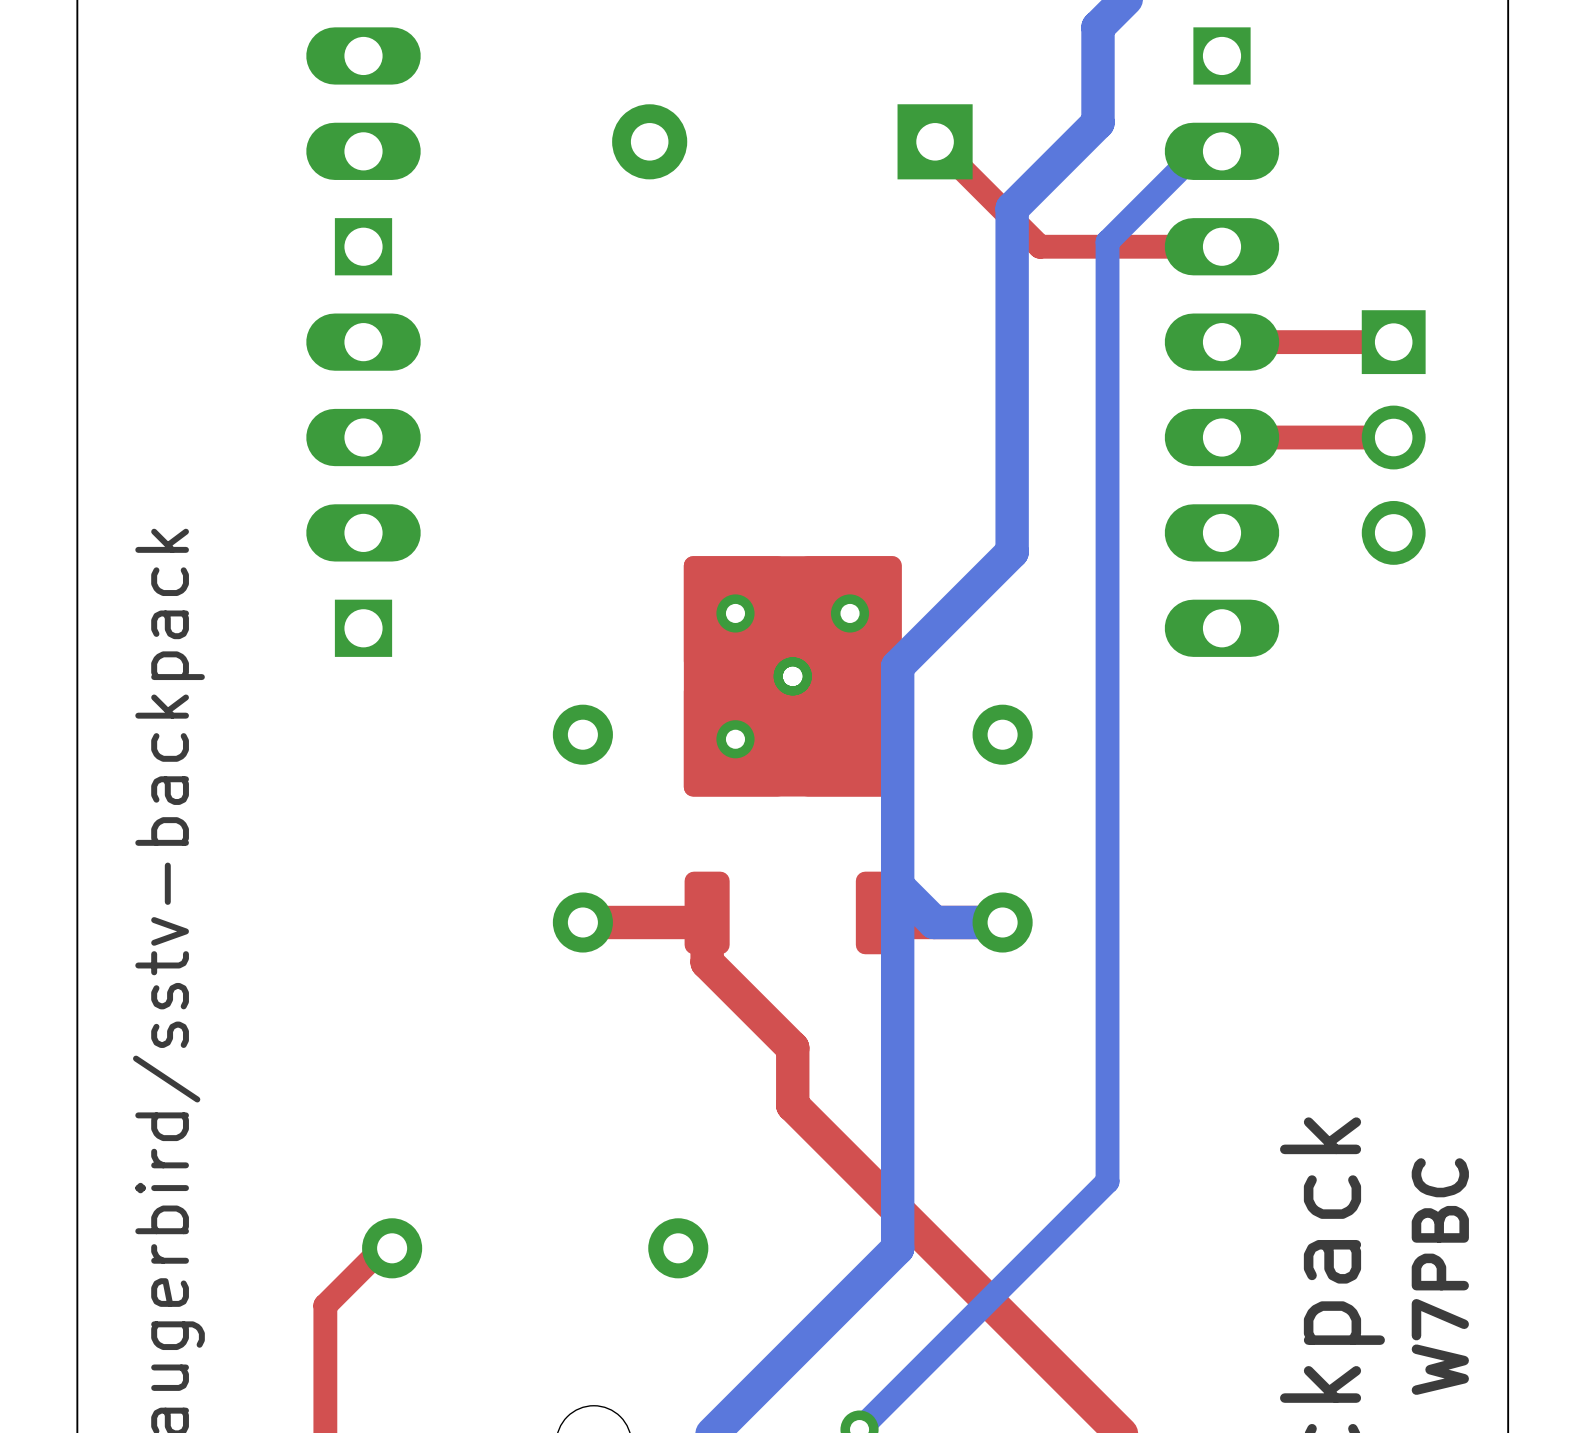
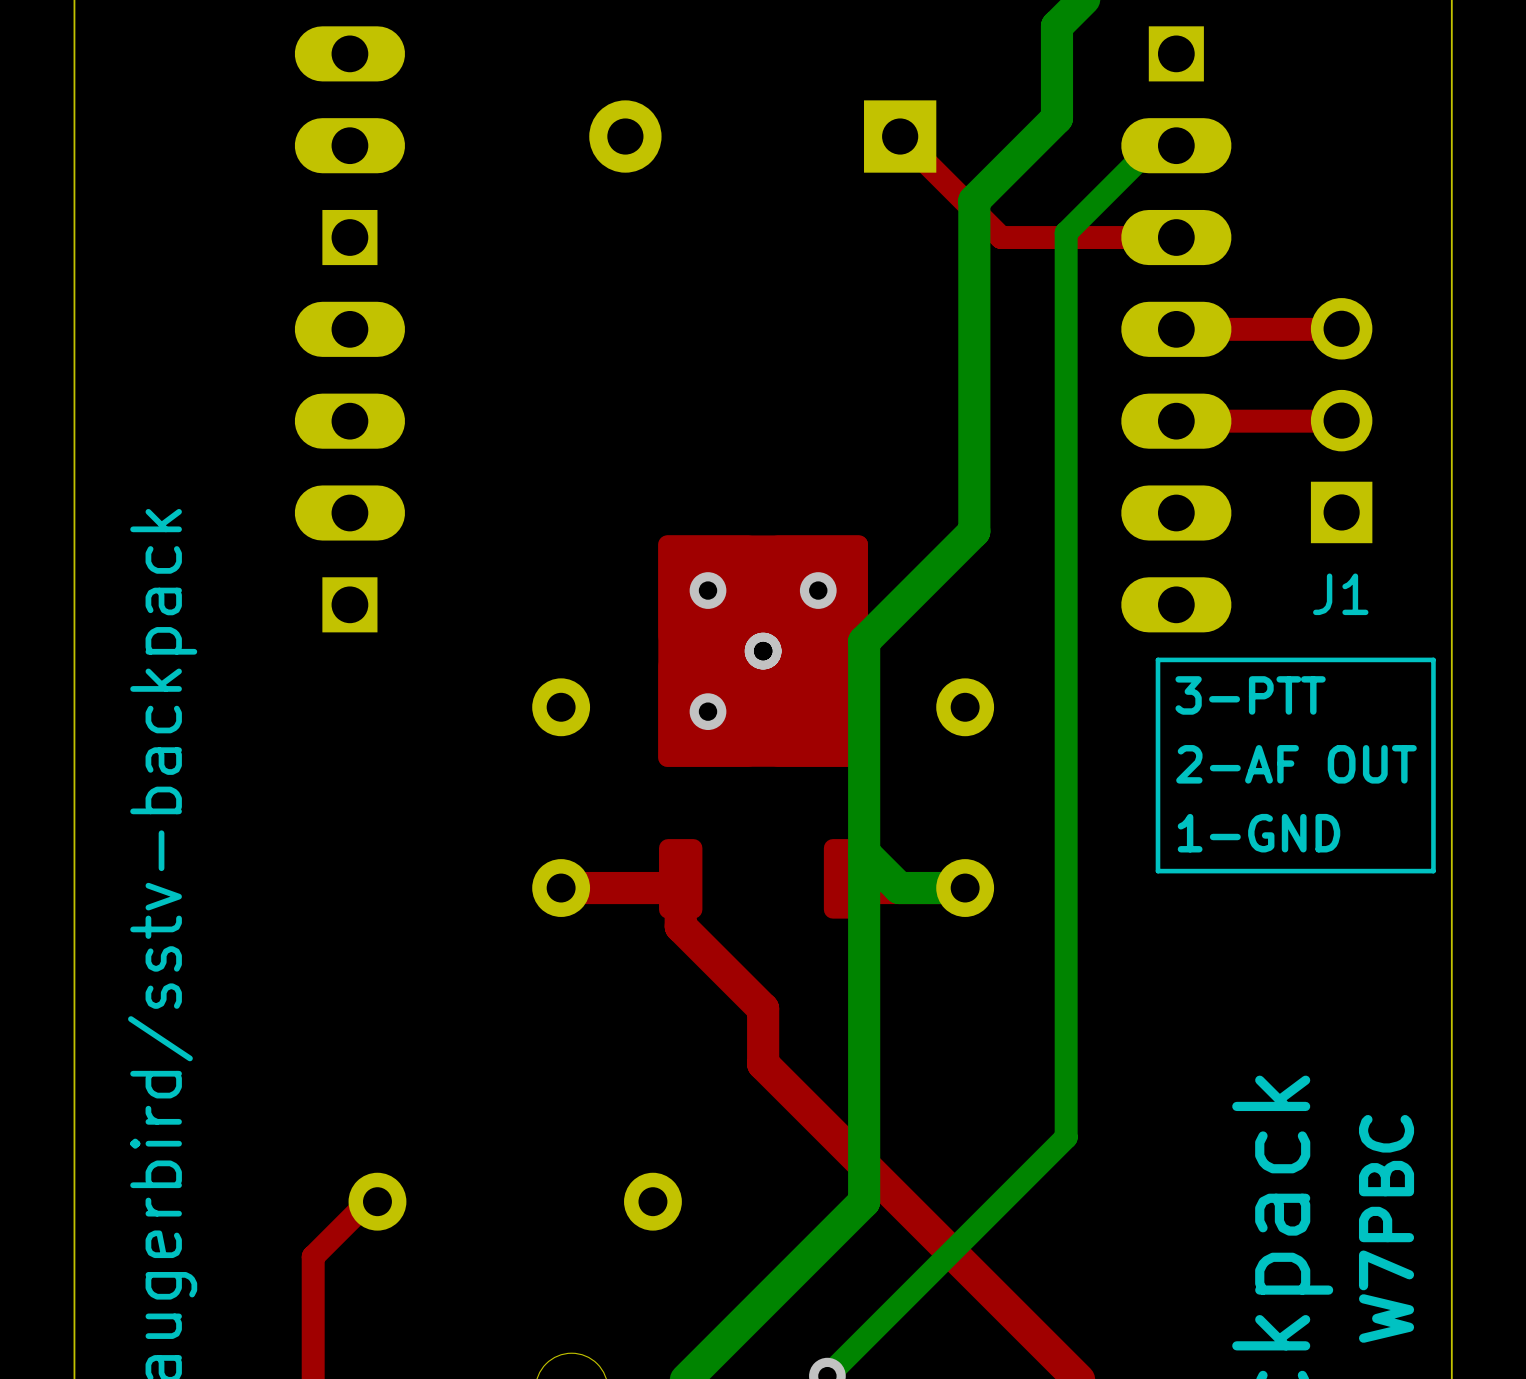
part rotation: 0° (1393, 437) -> 180° (1341, 420)
text: none -> J1 (1340, 594)
line: none -> (1433, 659) (1157, 659) (1157, 871) (1433, 871) (1433, 659)
text: none -> 3-PTT (1250, 695)
text: none -> 2-AF OUT (1296, 764)
text: none -> 1-GND (1258, 833)

